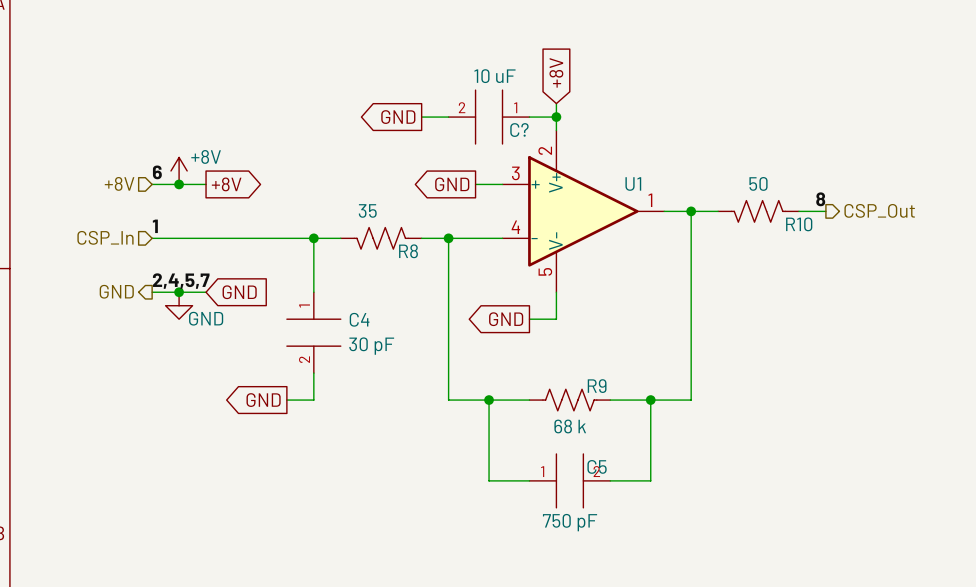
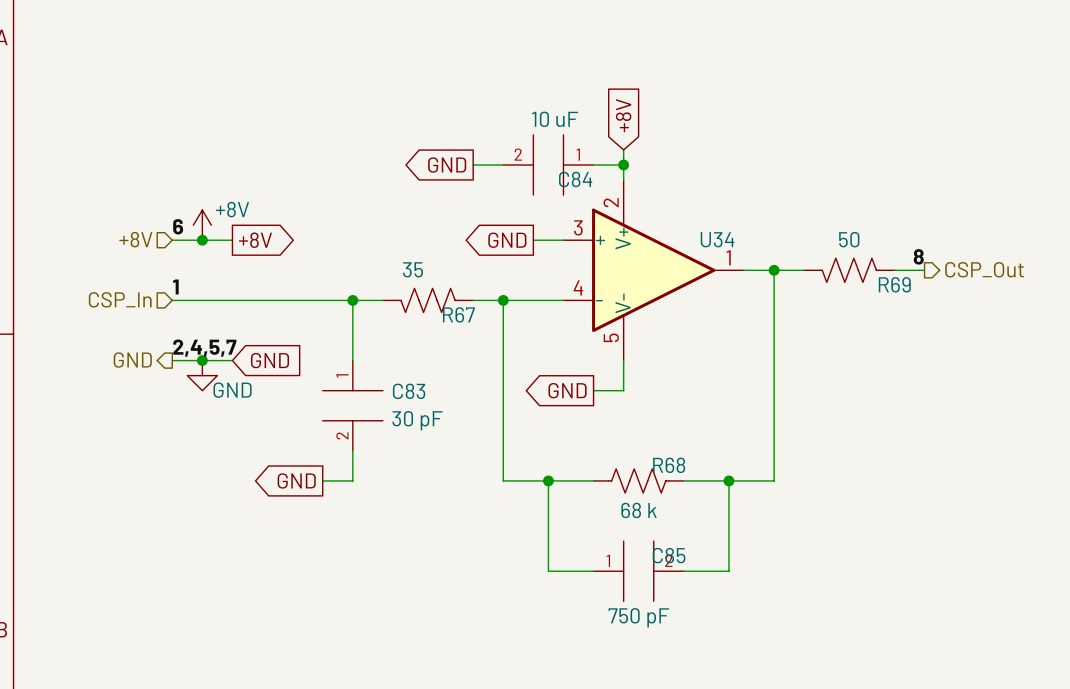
C? name: C? (519, 130) -> C84 (575, 179)
U1 name: U1 (633, 184) -> U34 (717, 239)
R10 name: R10 (799, 224) -> R69 (894, 284)
R8 name: R8 (408, 251) -> R67 (458, 314)
C4 name: C4 (359, 319) -> C83 (409, 391)
R9 name: R9 (597, 386) -> R68 (669, 465)
C5 name: C5 (597, 466) -> C85 (669, 555)

